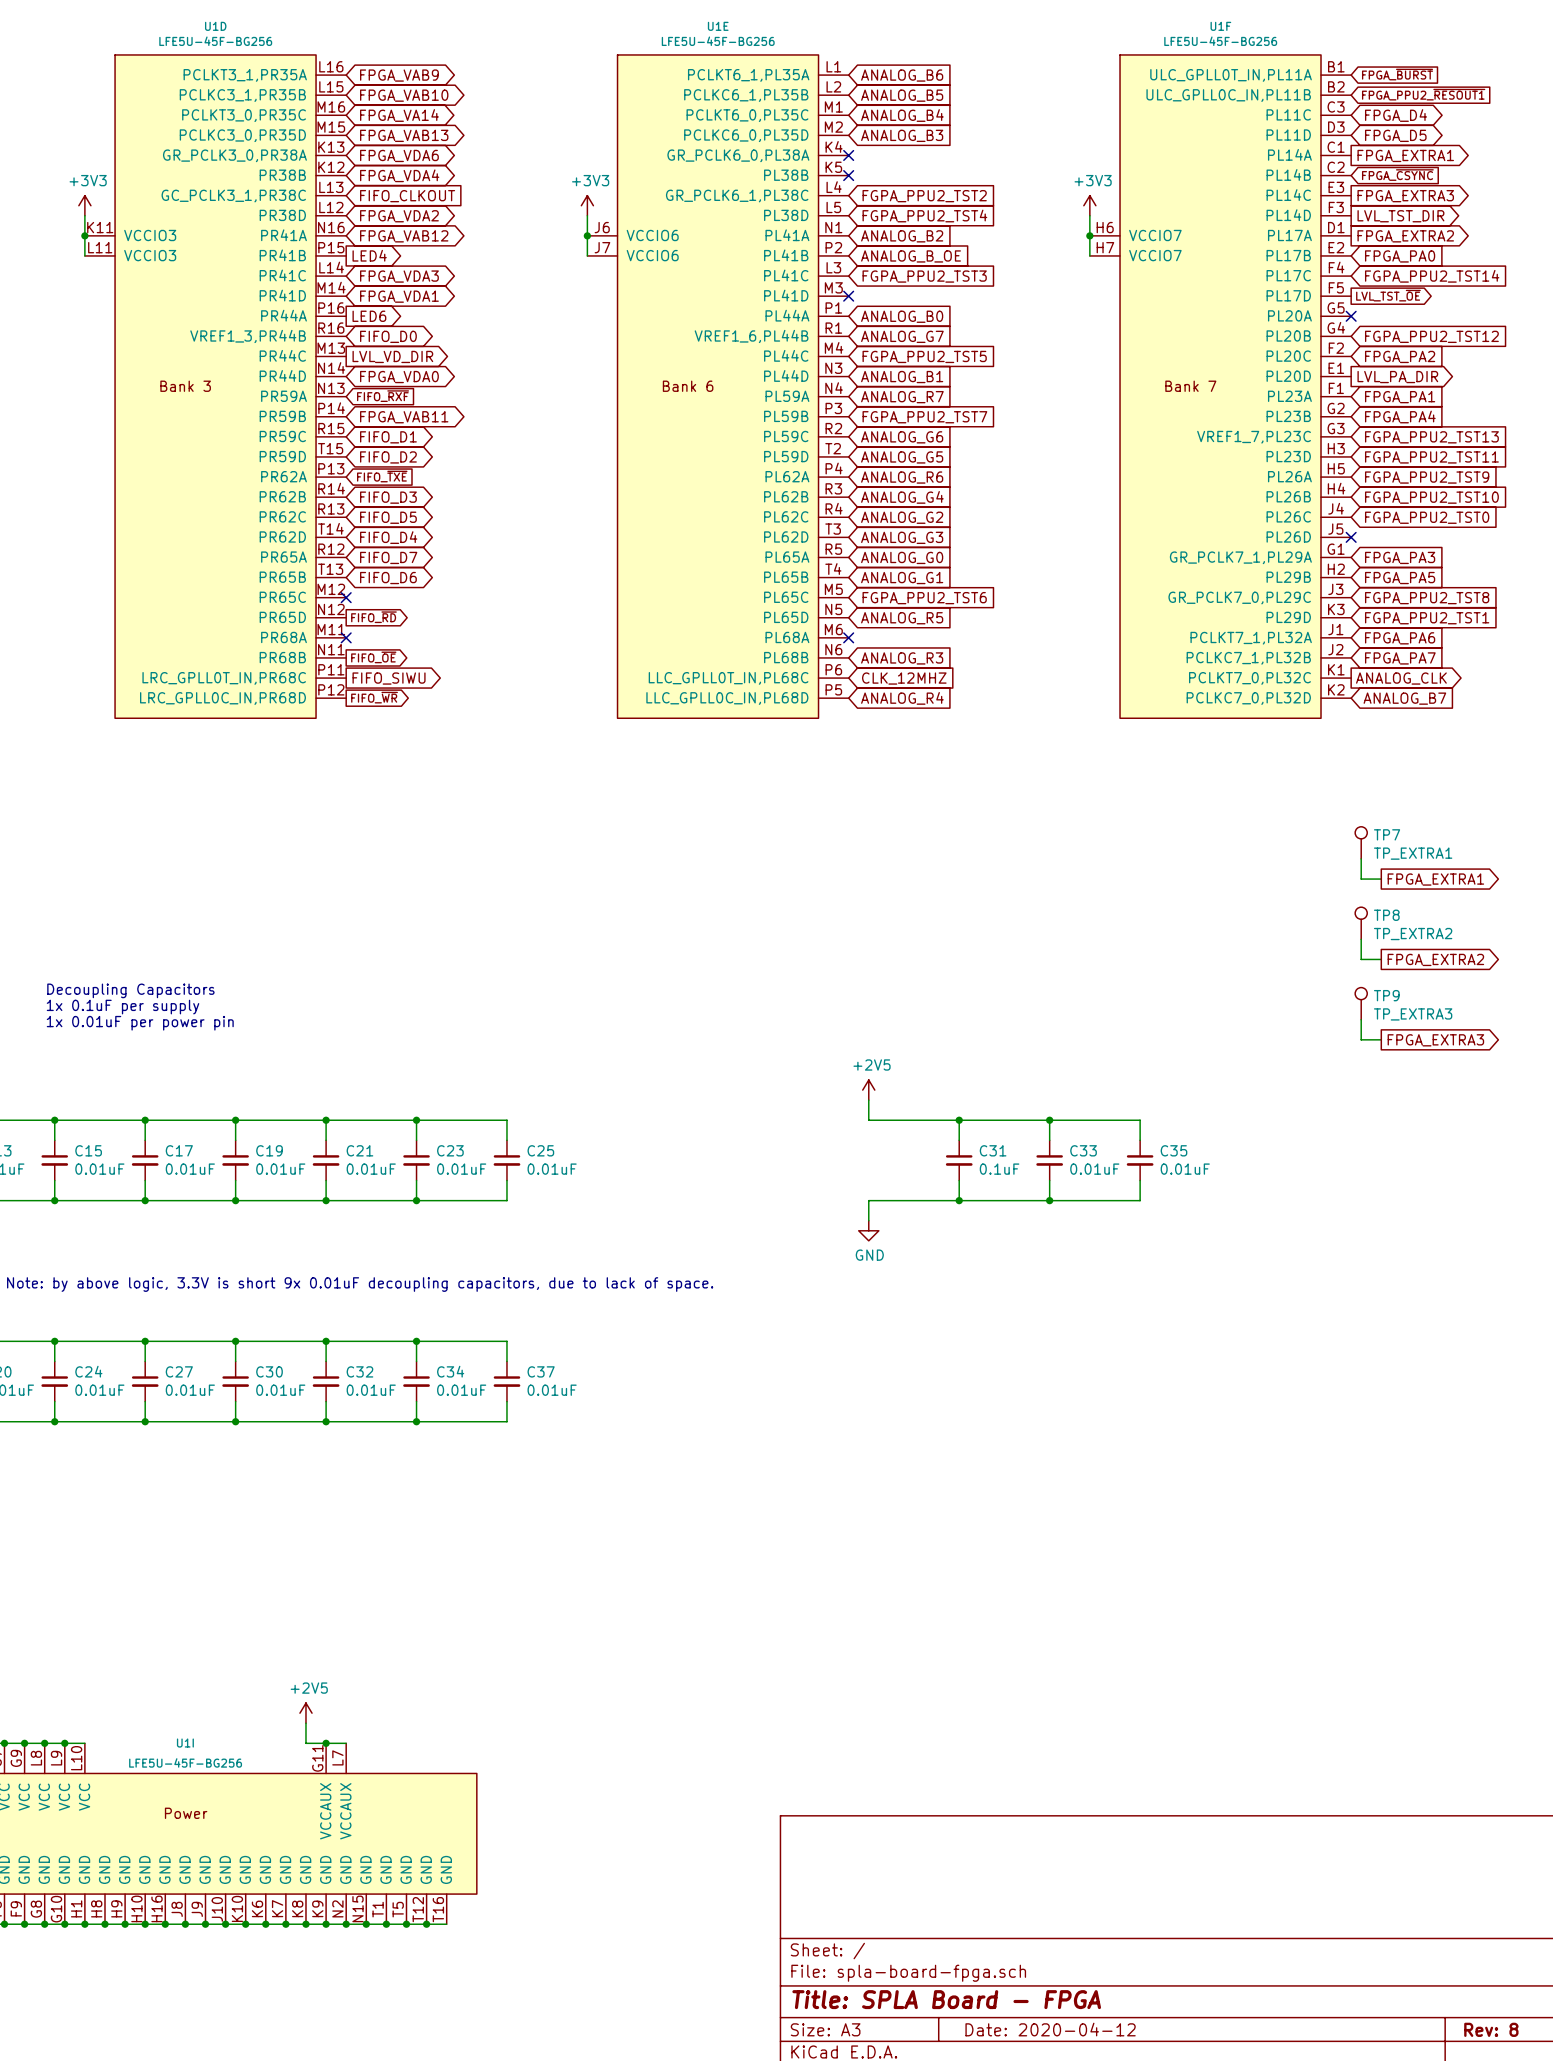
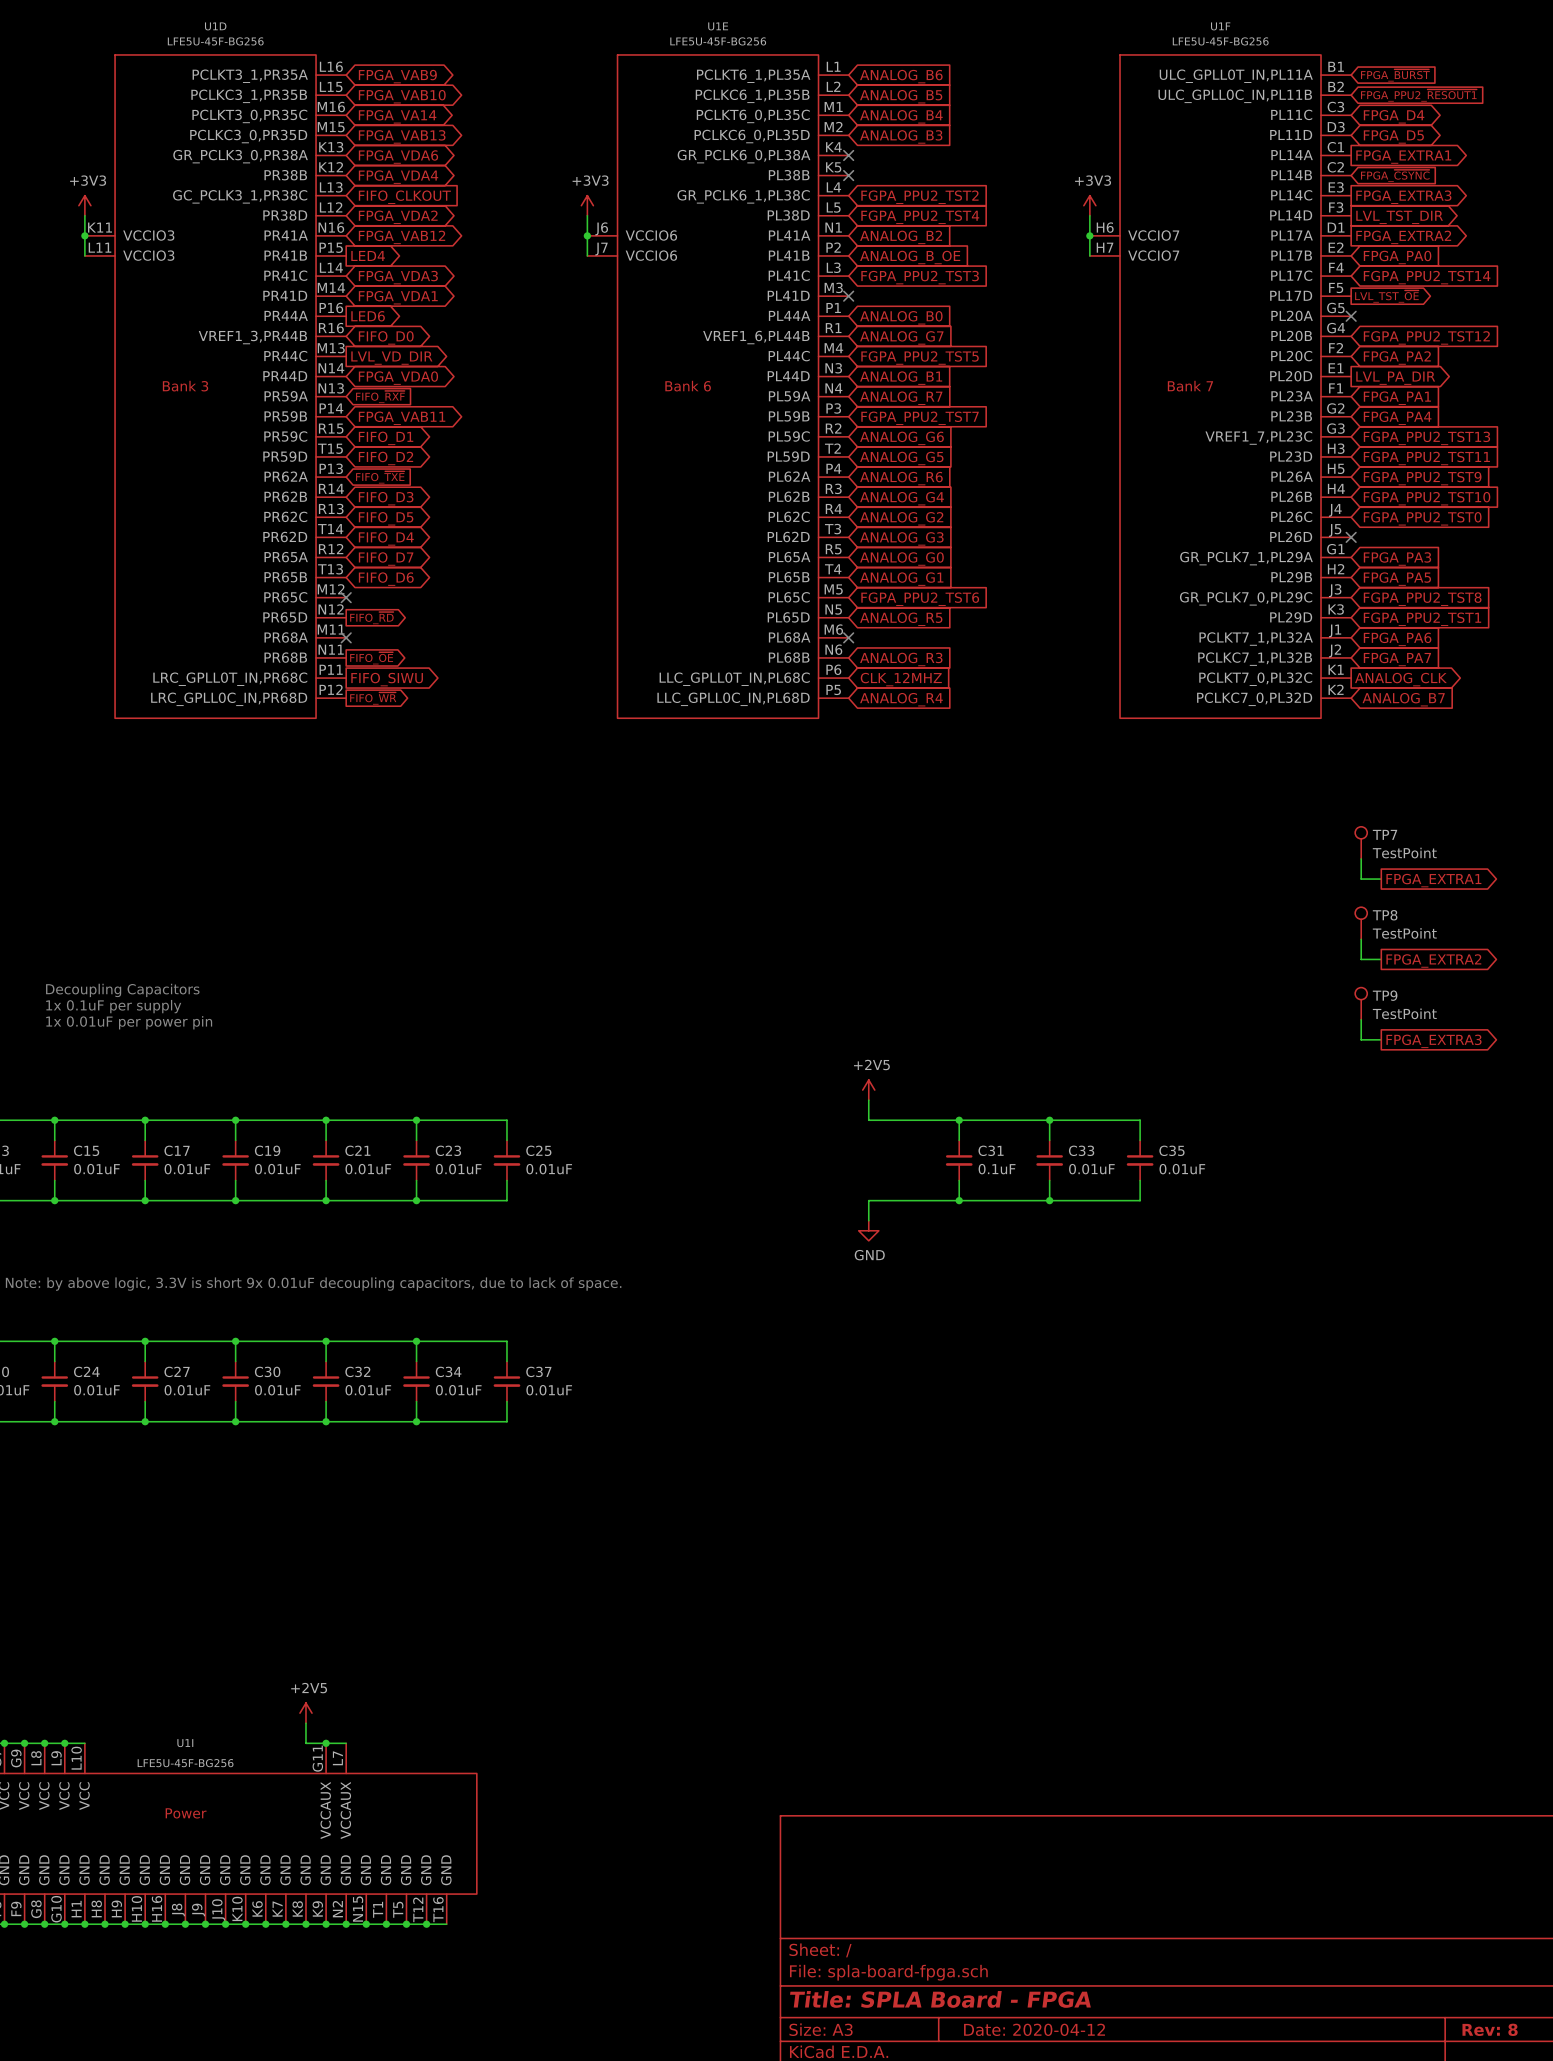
TP7 value: TP_EXTRA1 (1413, 853) -> TestPoint (1404, 853)
TP8 value: TP_EXTRA2 (1413, 934) -> TestPoint (1404, 933)
TP9 value: TP_EXTRA3 (1413, 1014) -> TestPoint (1404, 1013)

